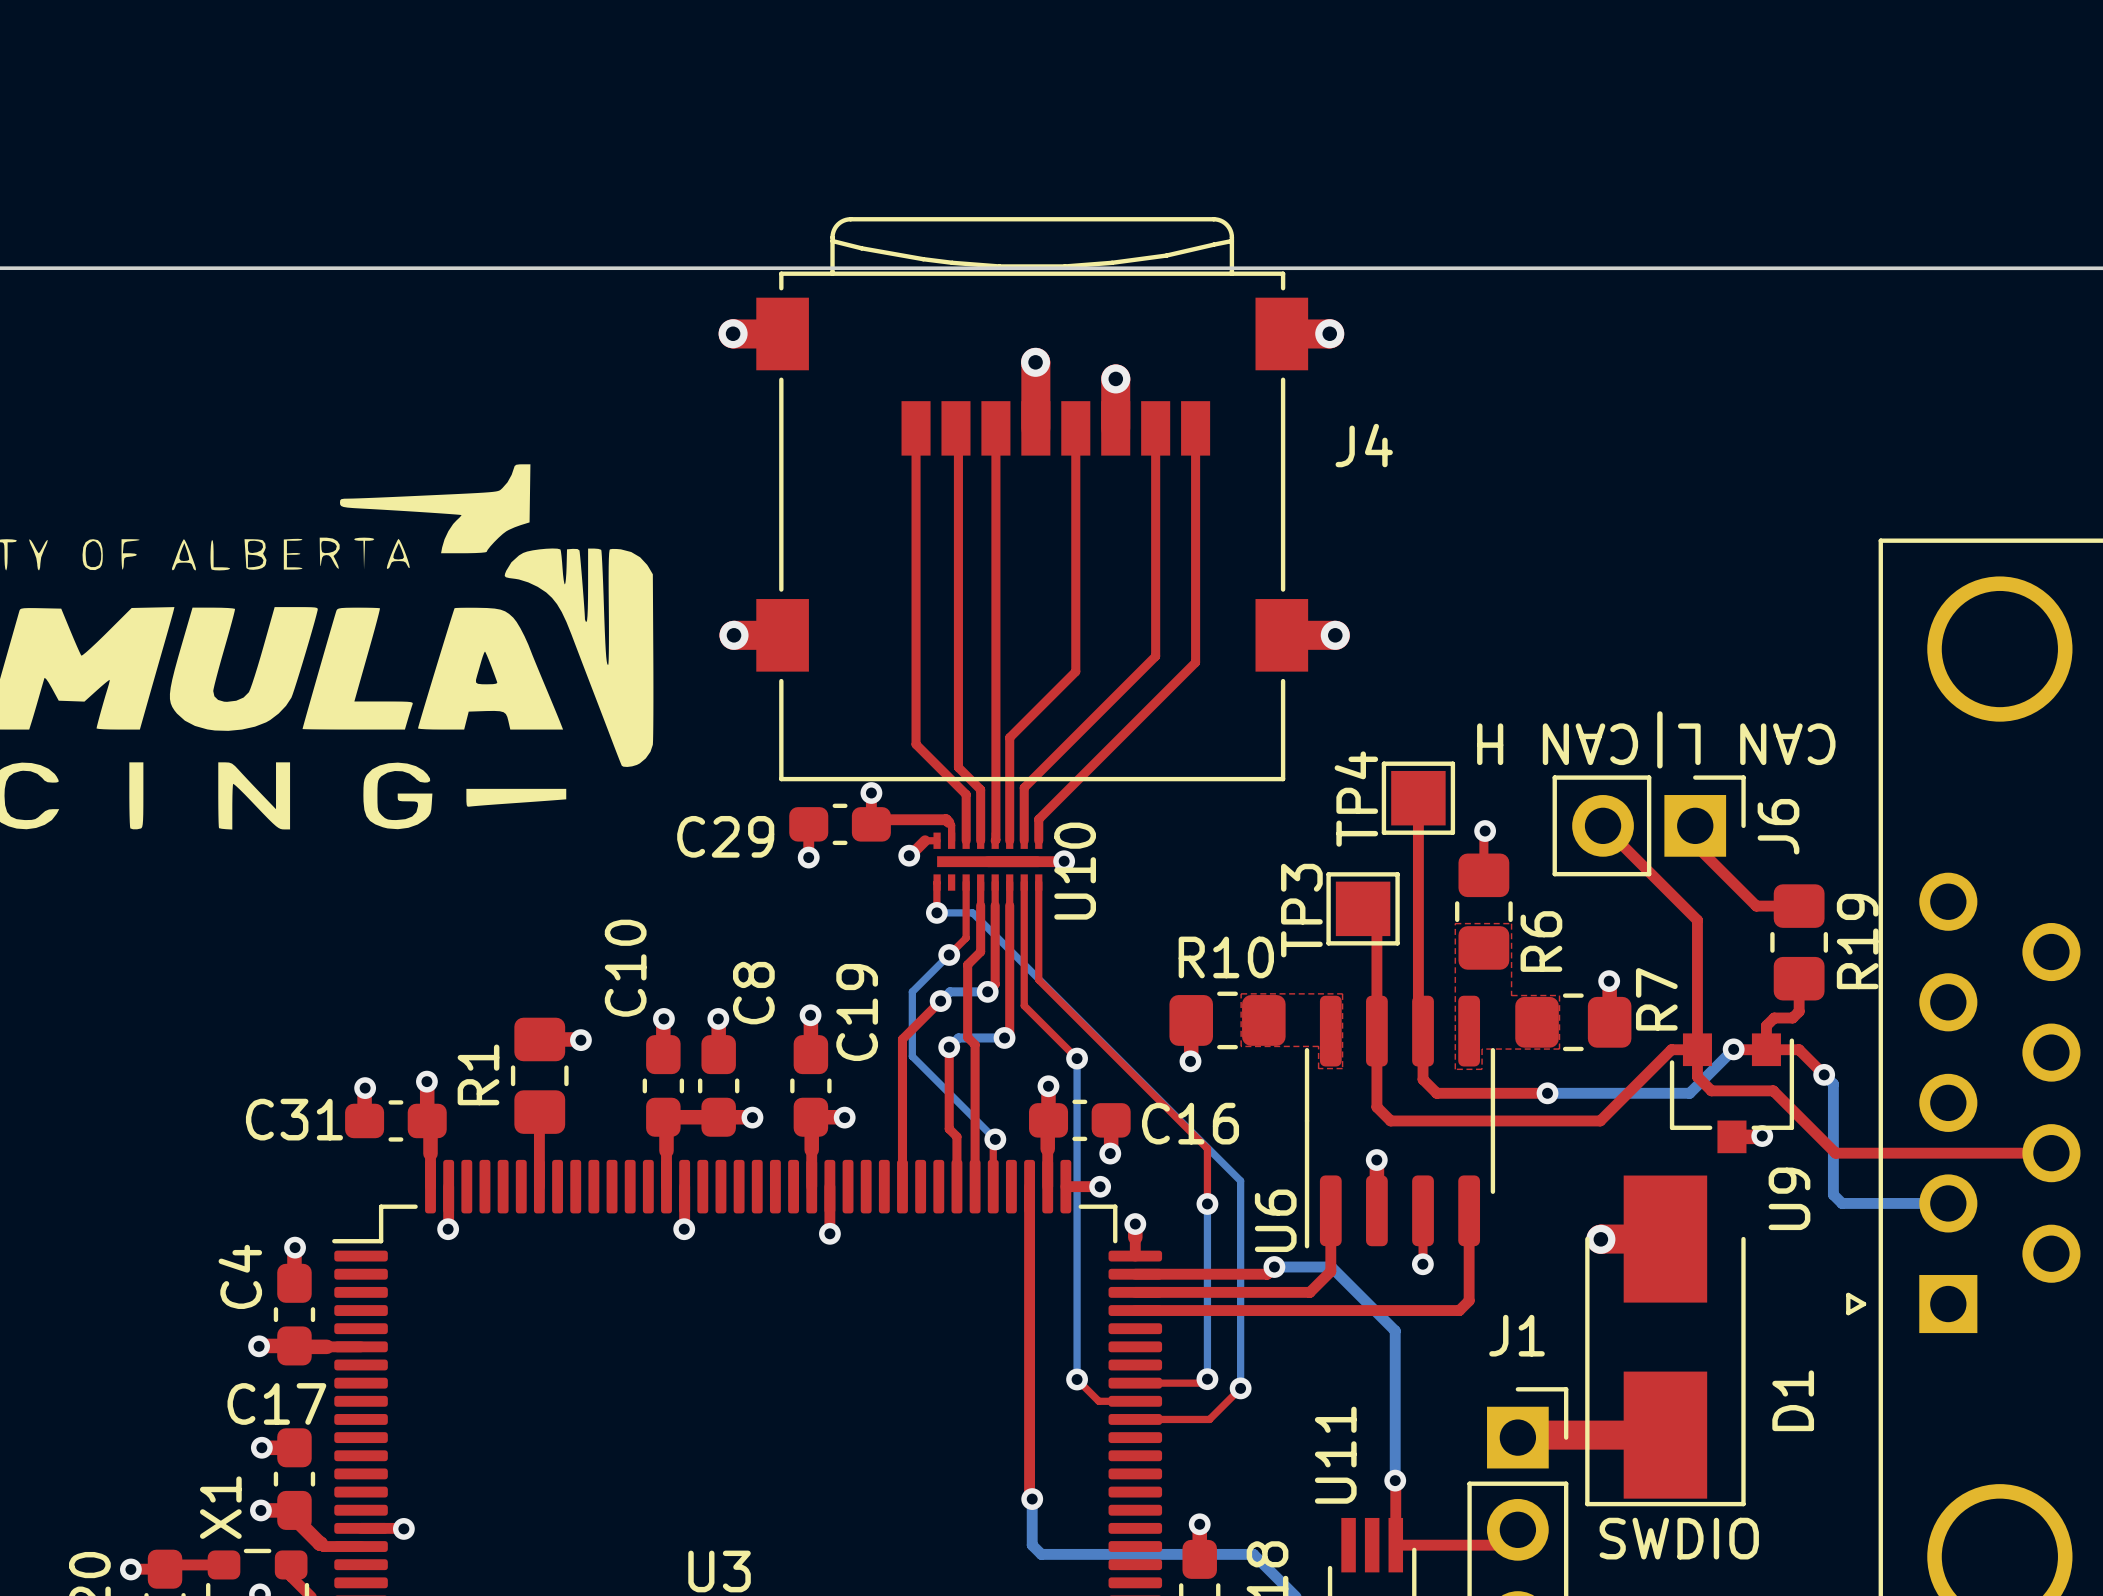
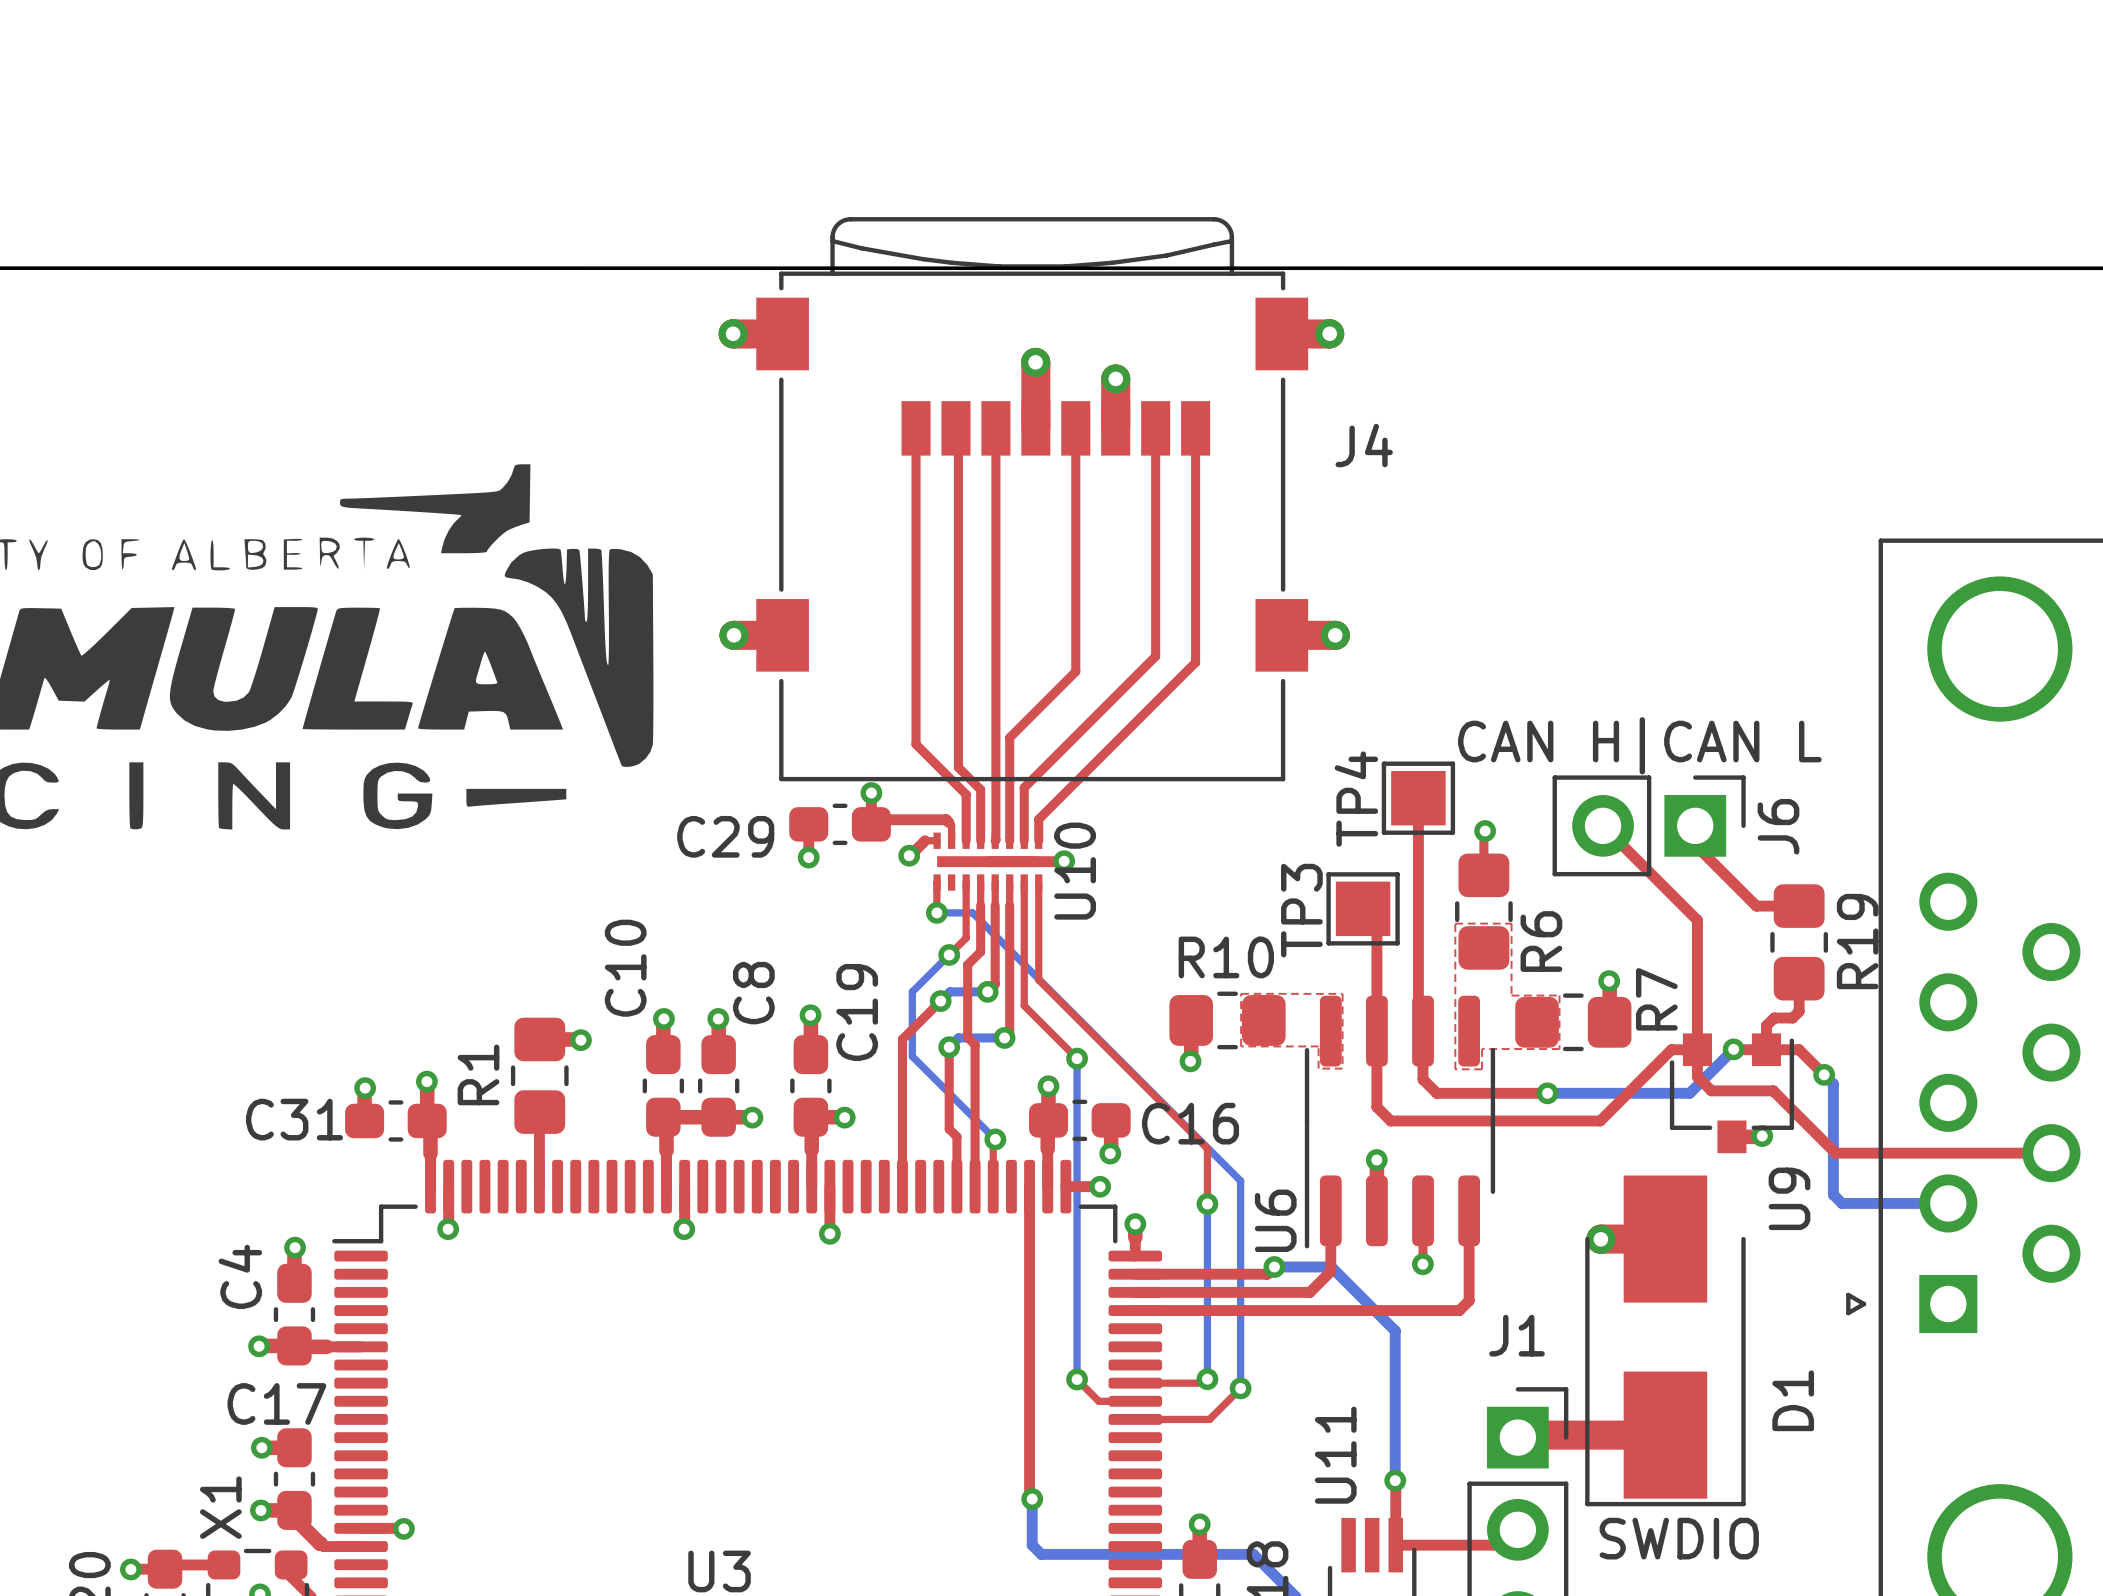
text: CAN L| (1746, 739) -> CAN L (1742, 741)
text: CAN H (1557, 744) -> CAN H| (1551, 745)

